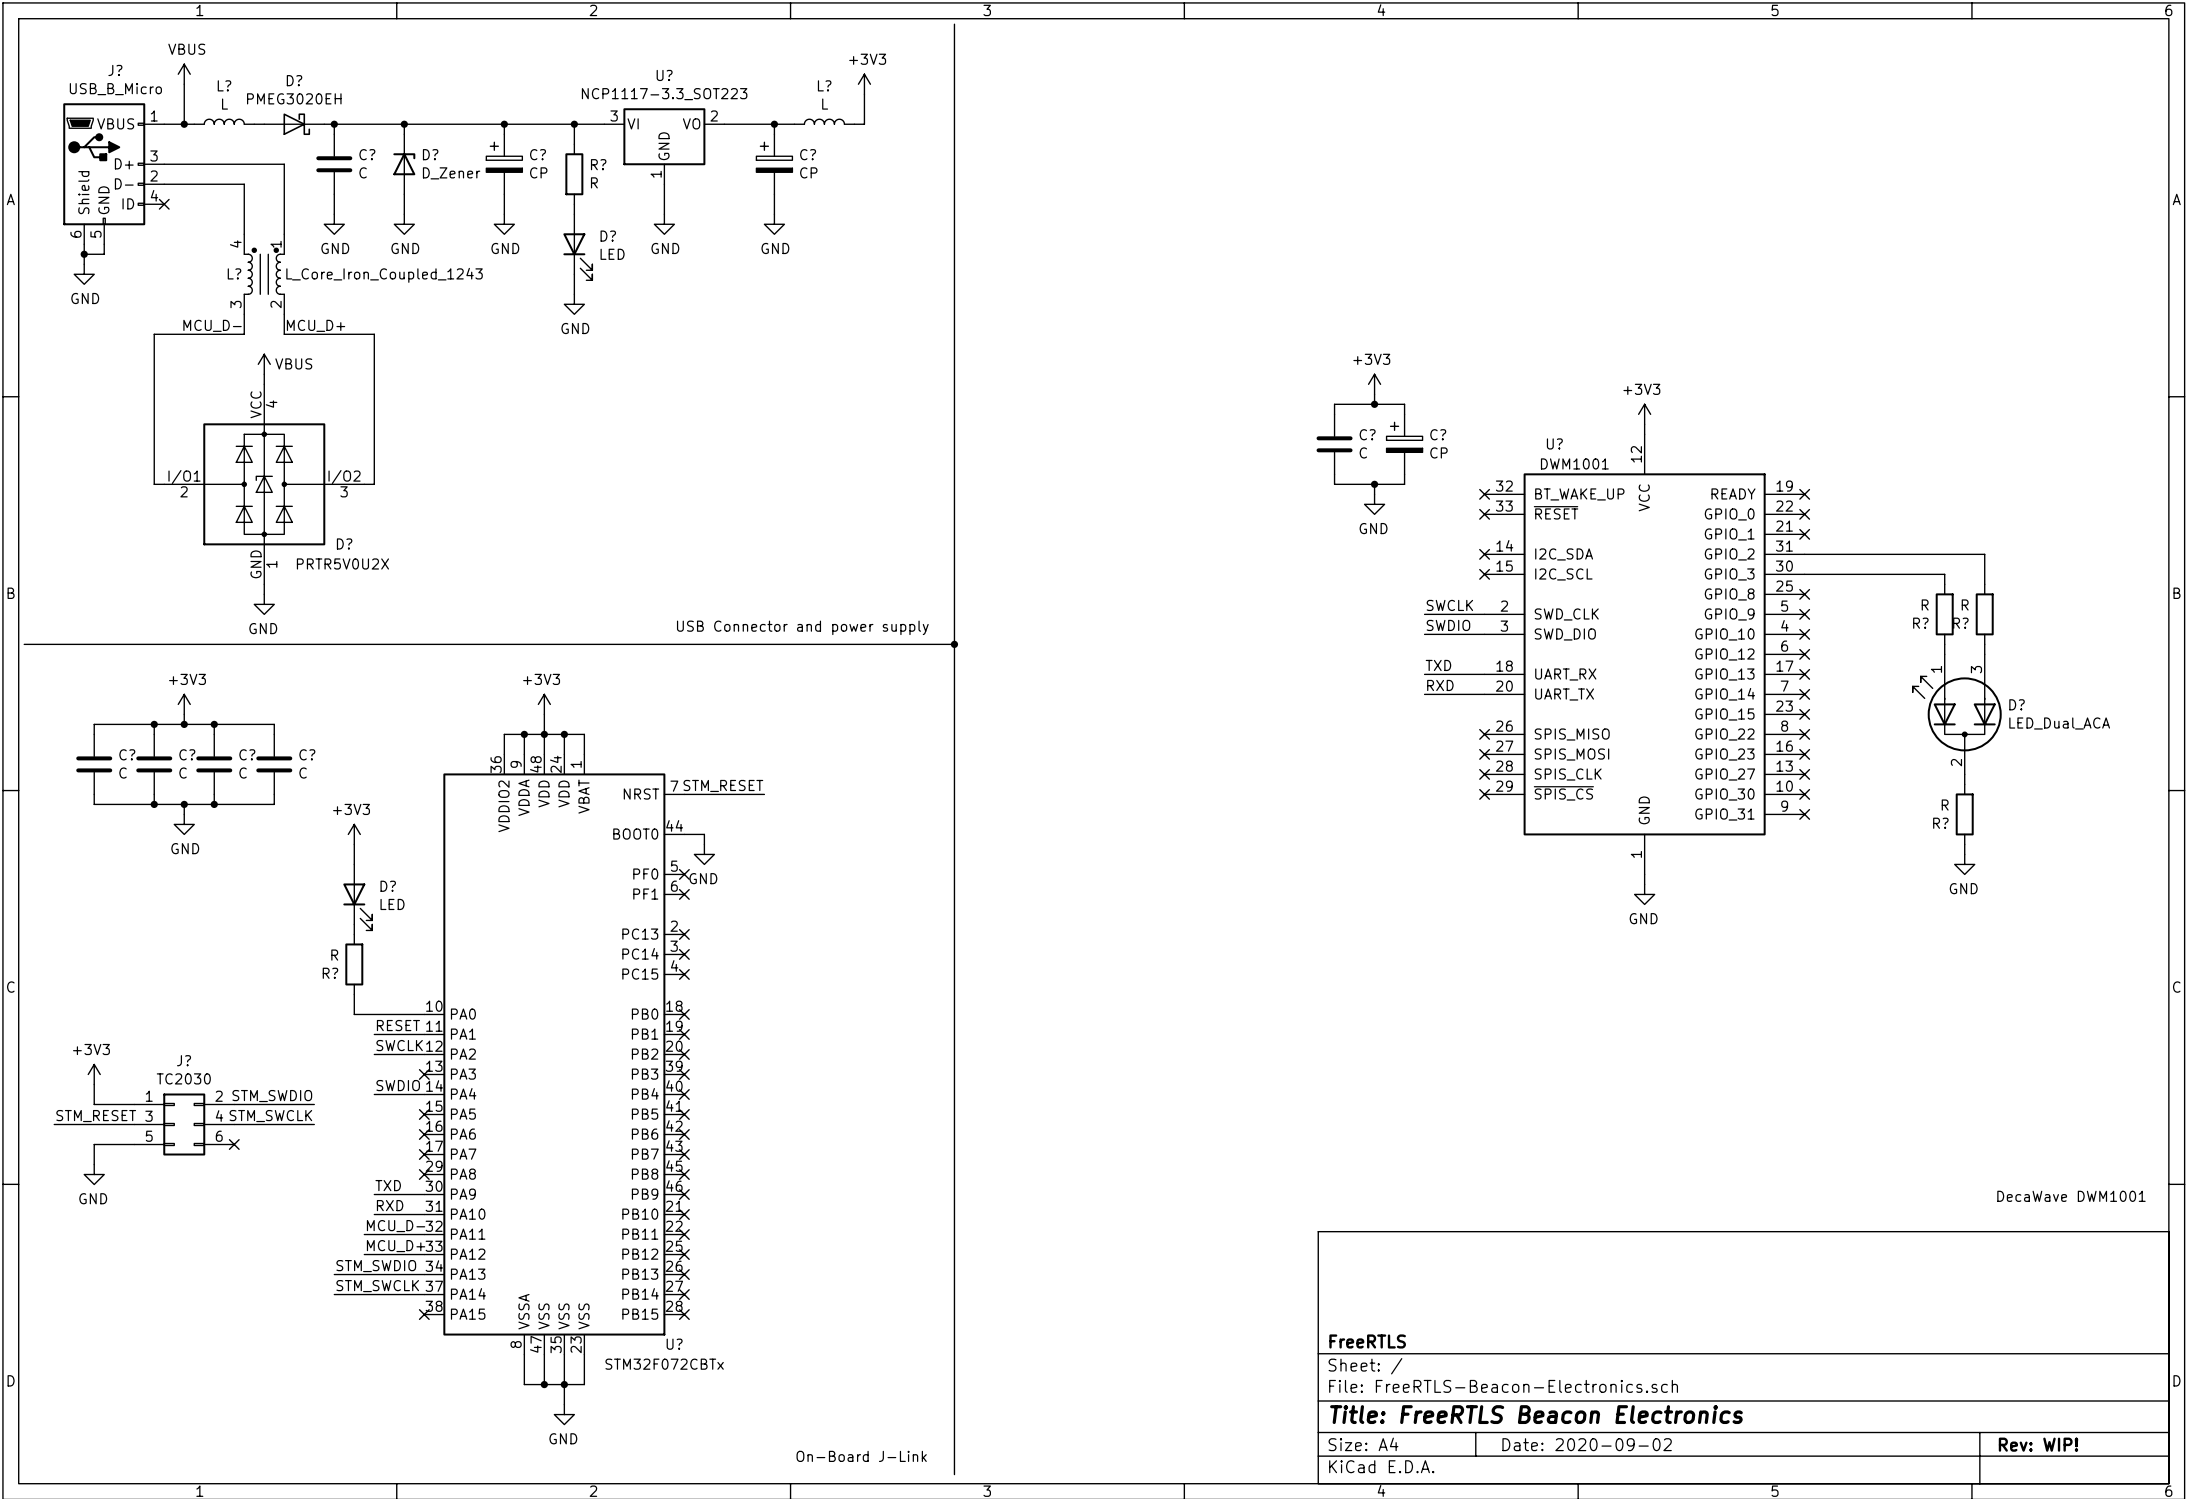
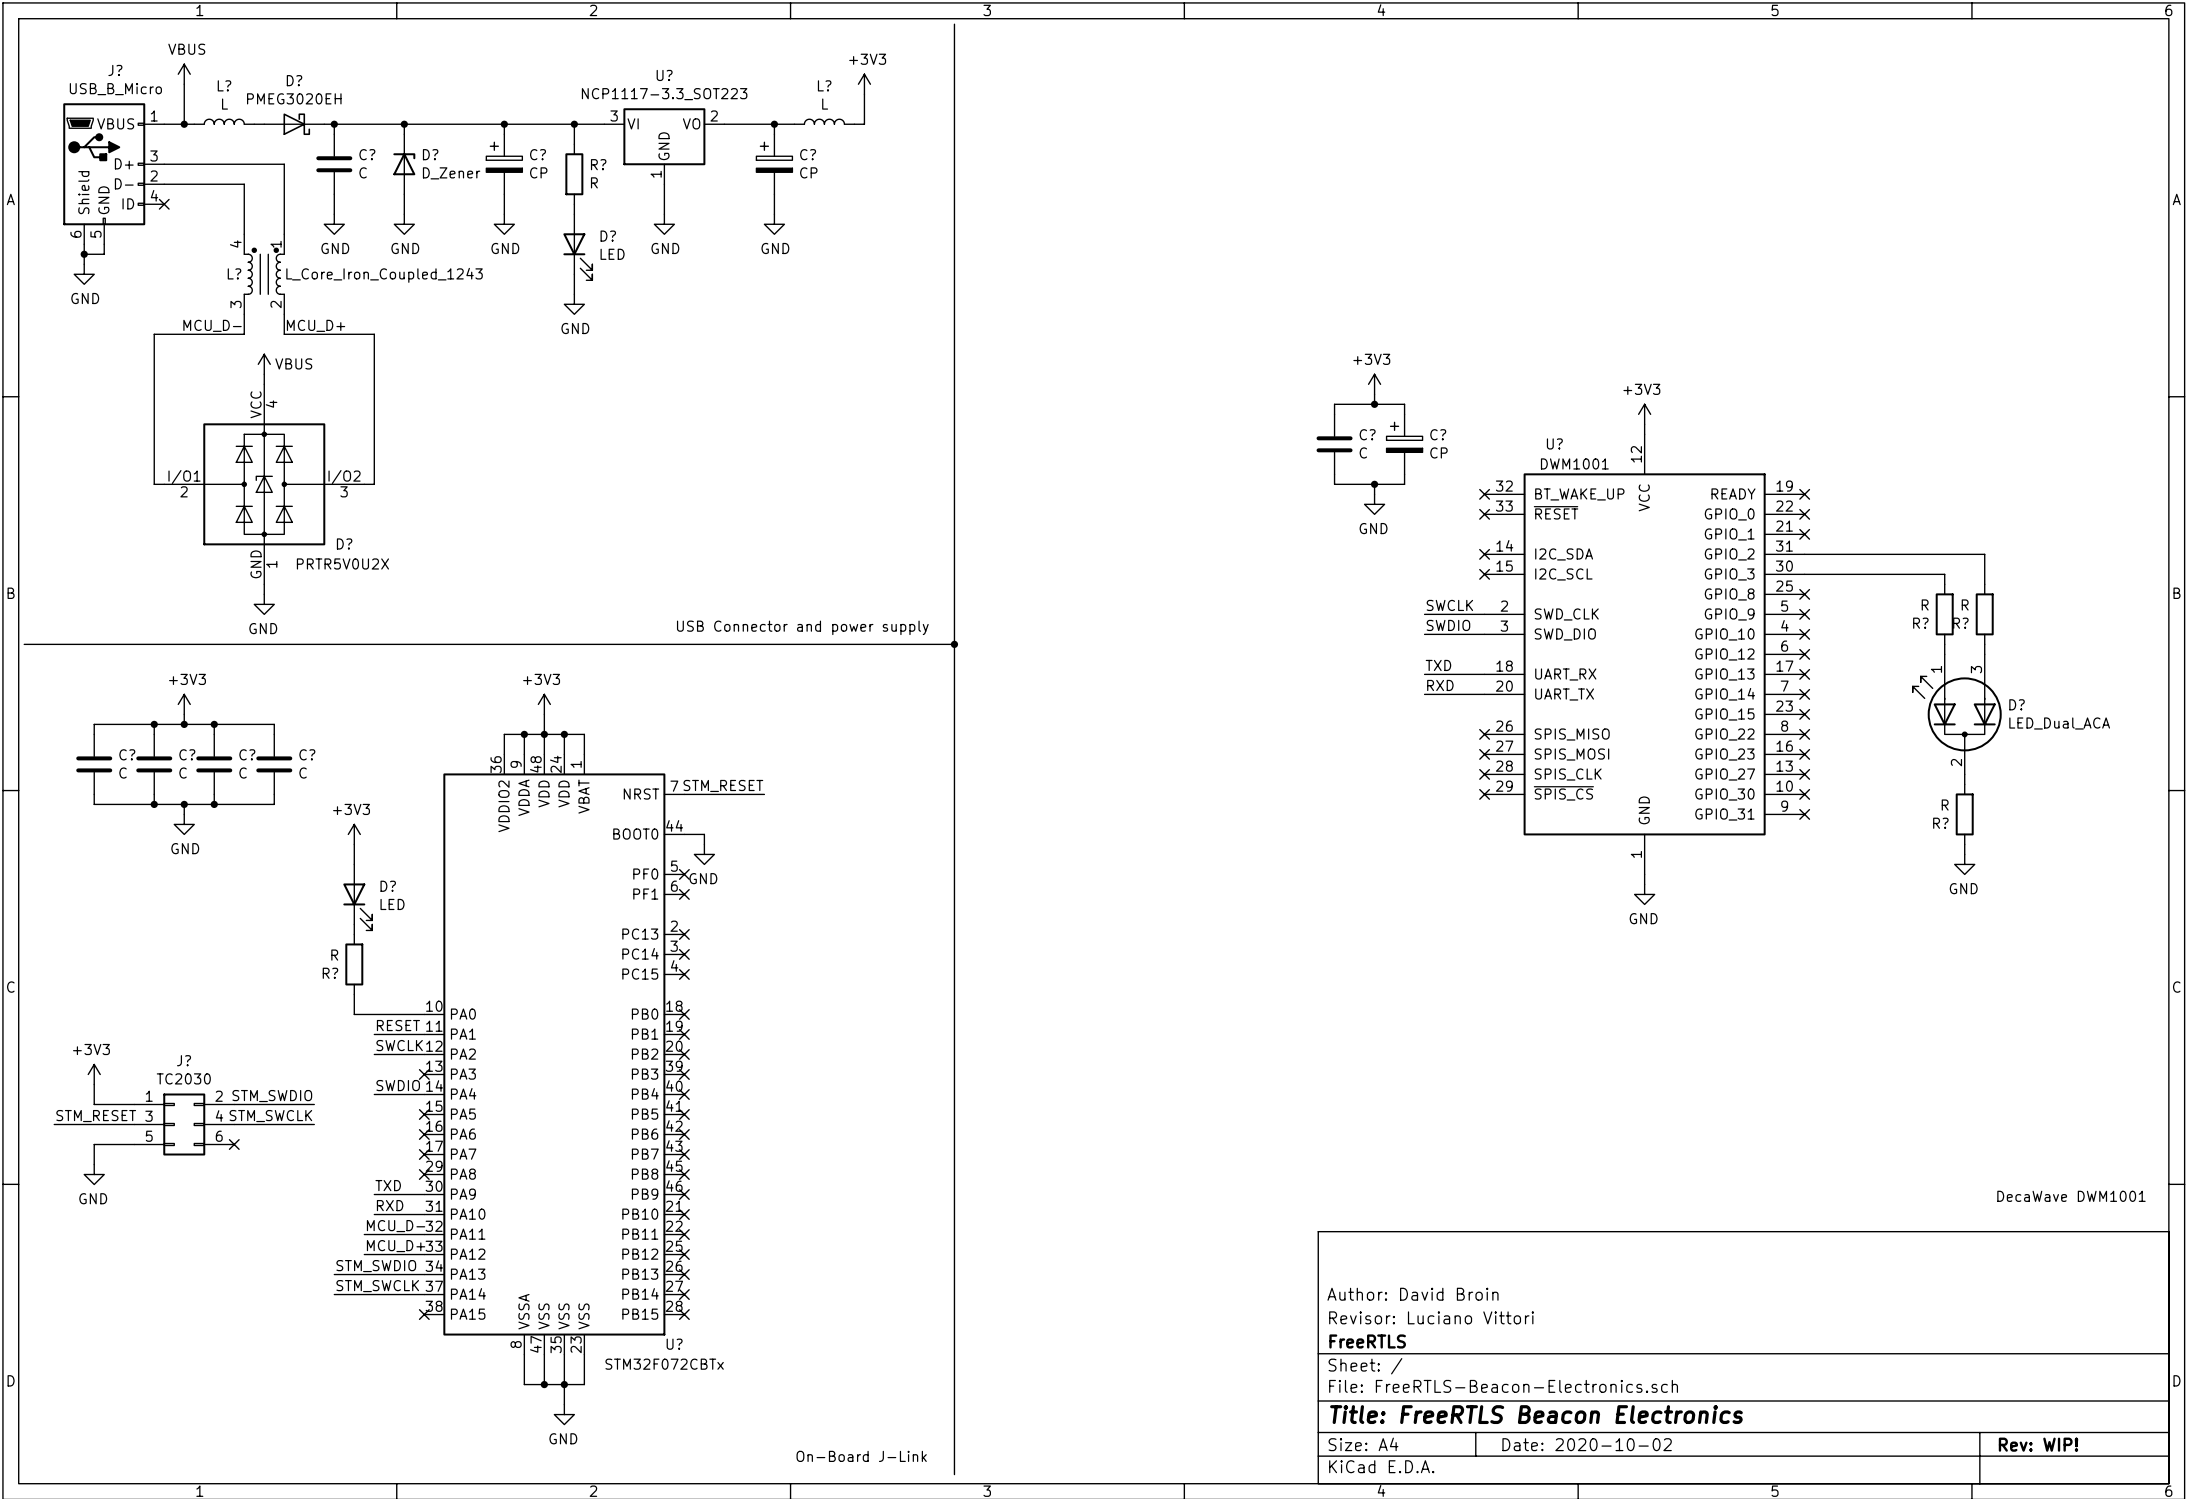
title block: none -> Author: David Broin (1413, 1294)
title block: none -> Revisor: Luciano Vittori (1431, 1317)
title block: Date: 2020-09-02 (1587, 1444) -> Date: 2020-10-02 (1587, 1444)

